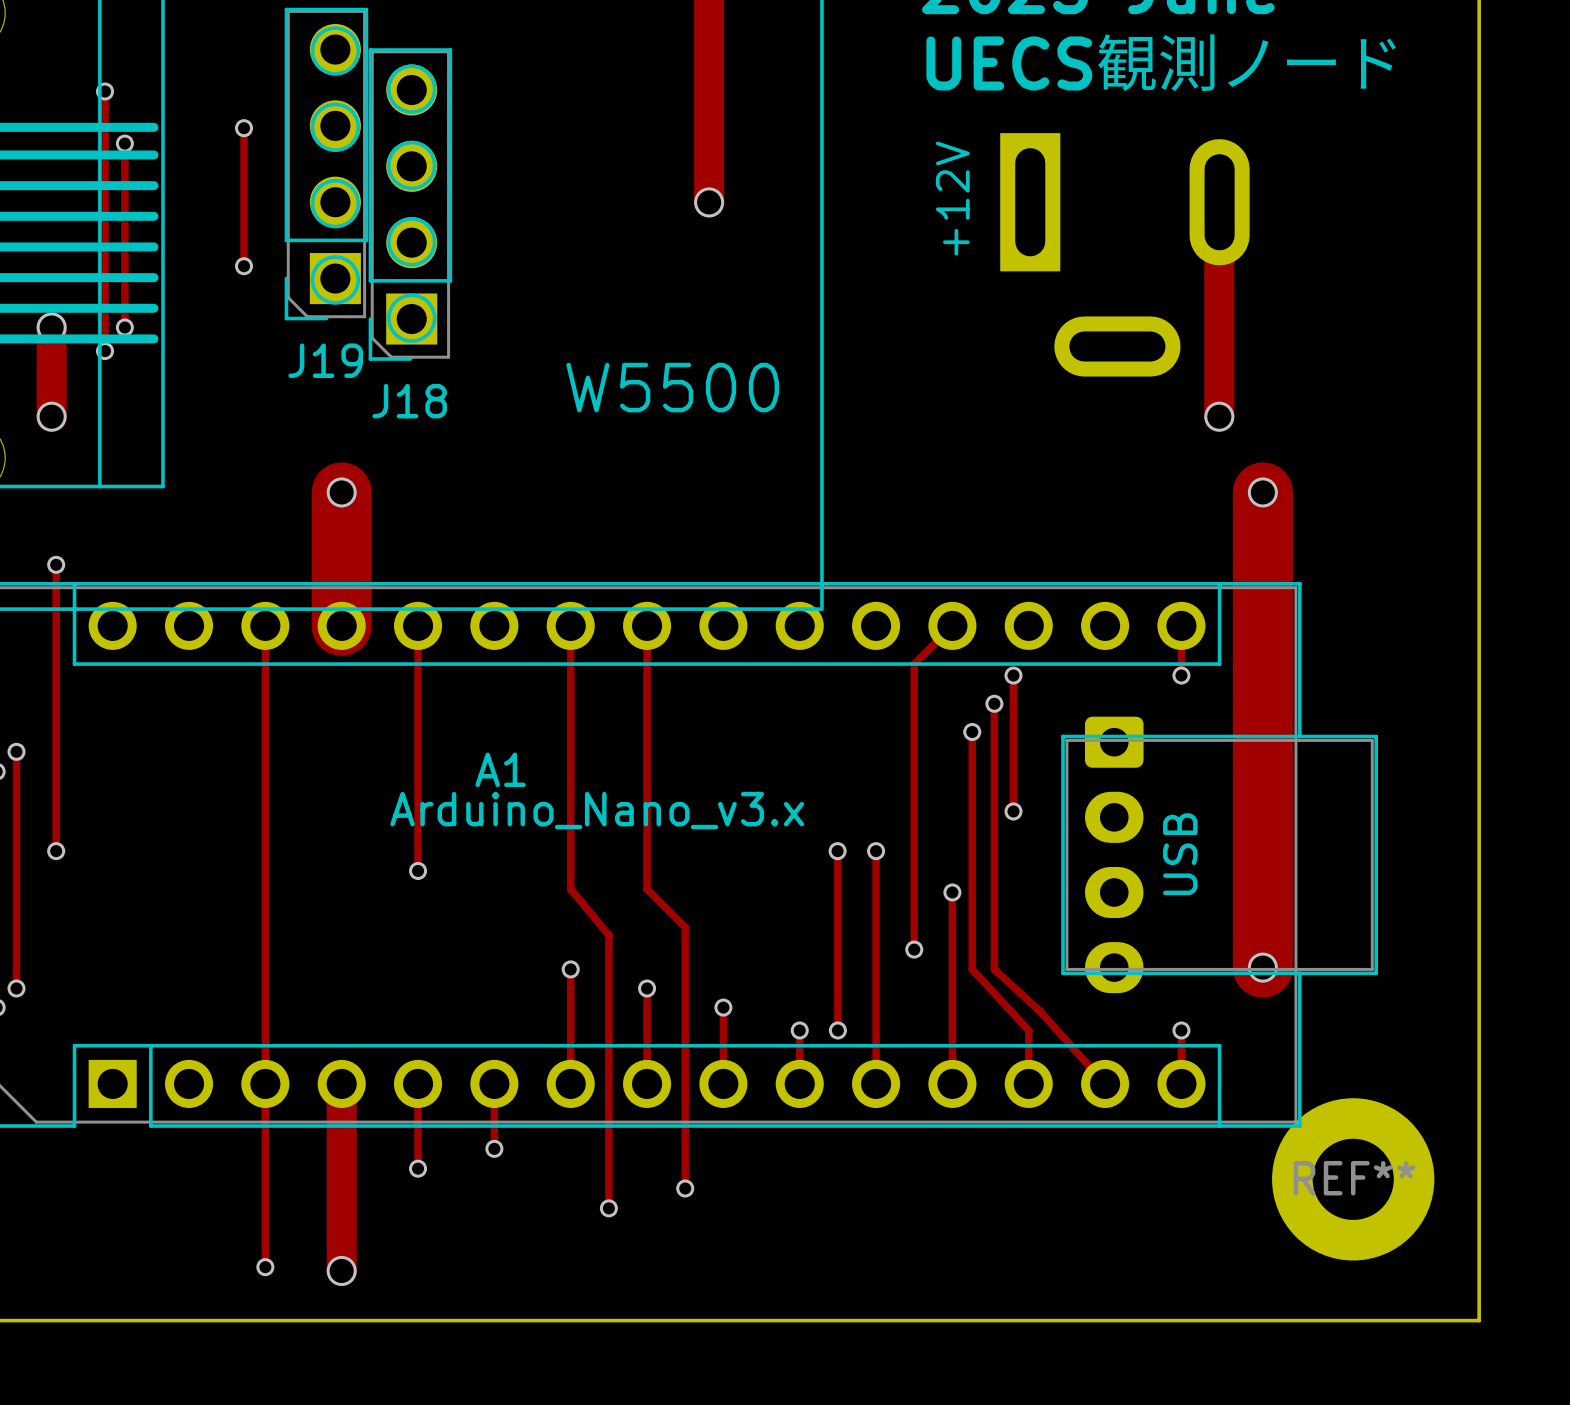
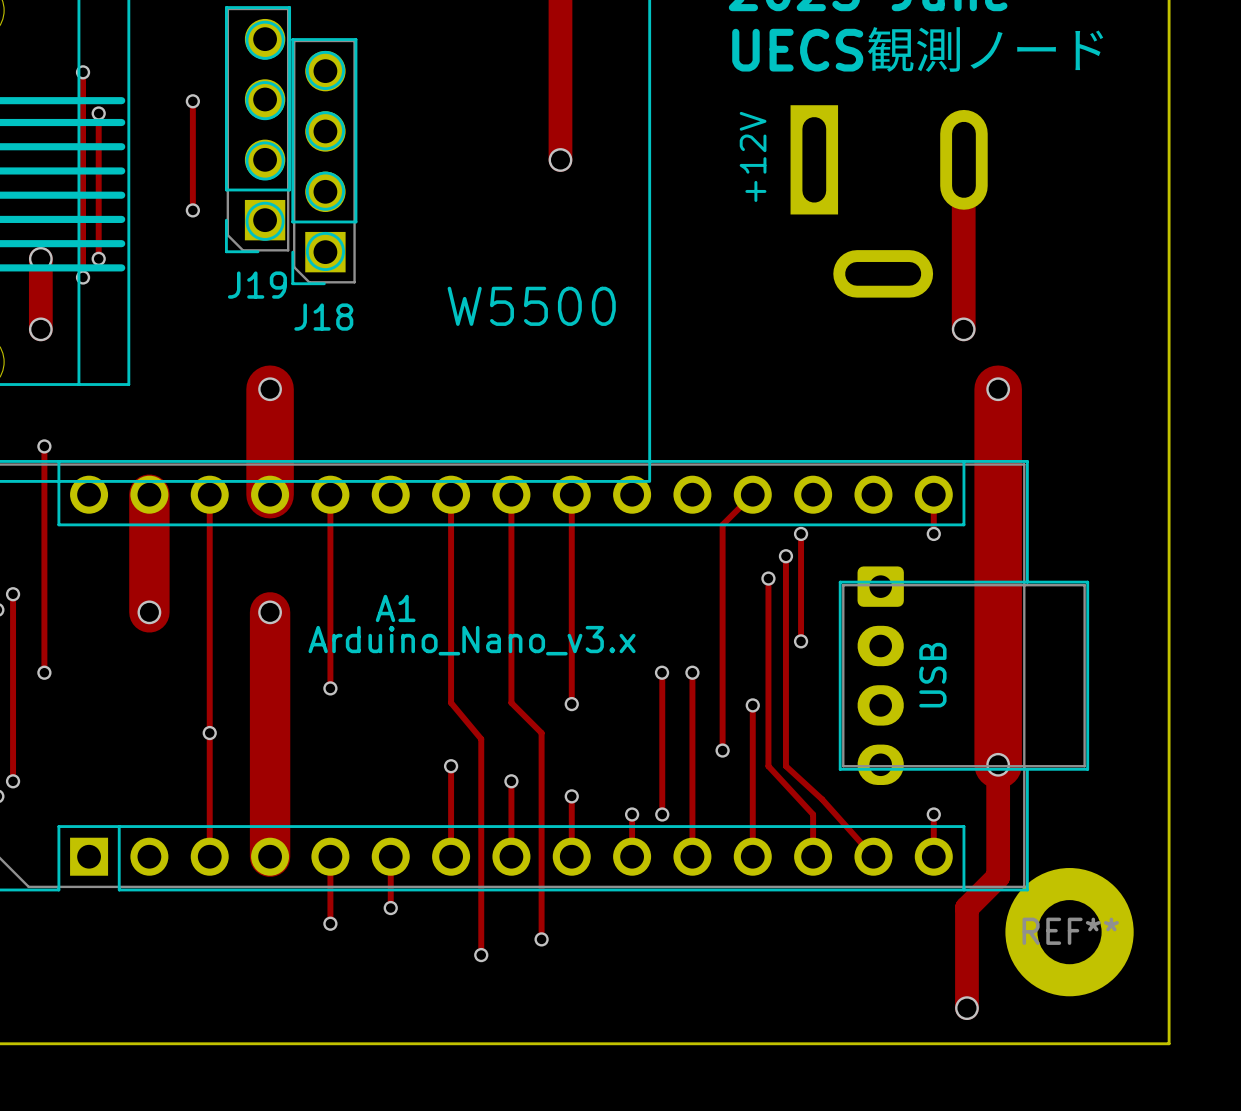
track: none -> (149, 494) (149, 612)
track: none -> (571, 494) (571, 704)
via: none -> (149, 612)
via: none -> (270, 612)
via: none -> (571, 704)
via: none -> (209, 733)
track: none -> (998, 764) (998, 876) (966, 908) (966, 1008)
track: (265, 1083) (265, 1267) -> none
track: (341, 1083) (341, 1270) -> (270, 856) (270, 612)
via: (265, 1267) -> none
via: (341, 1270) -> none
via: none -> (966, 1008)

